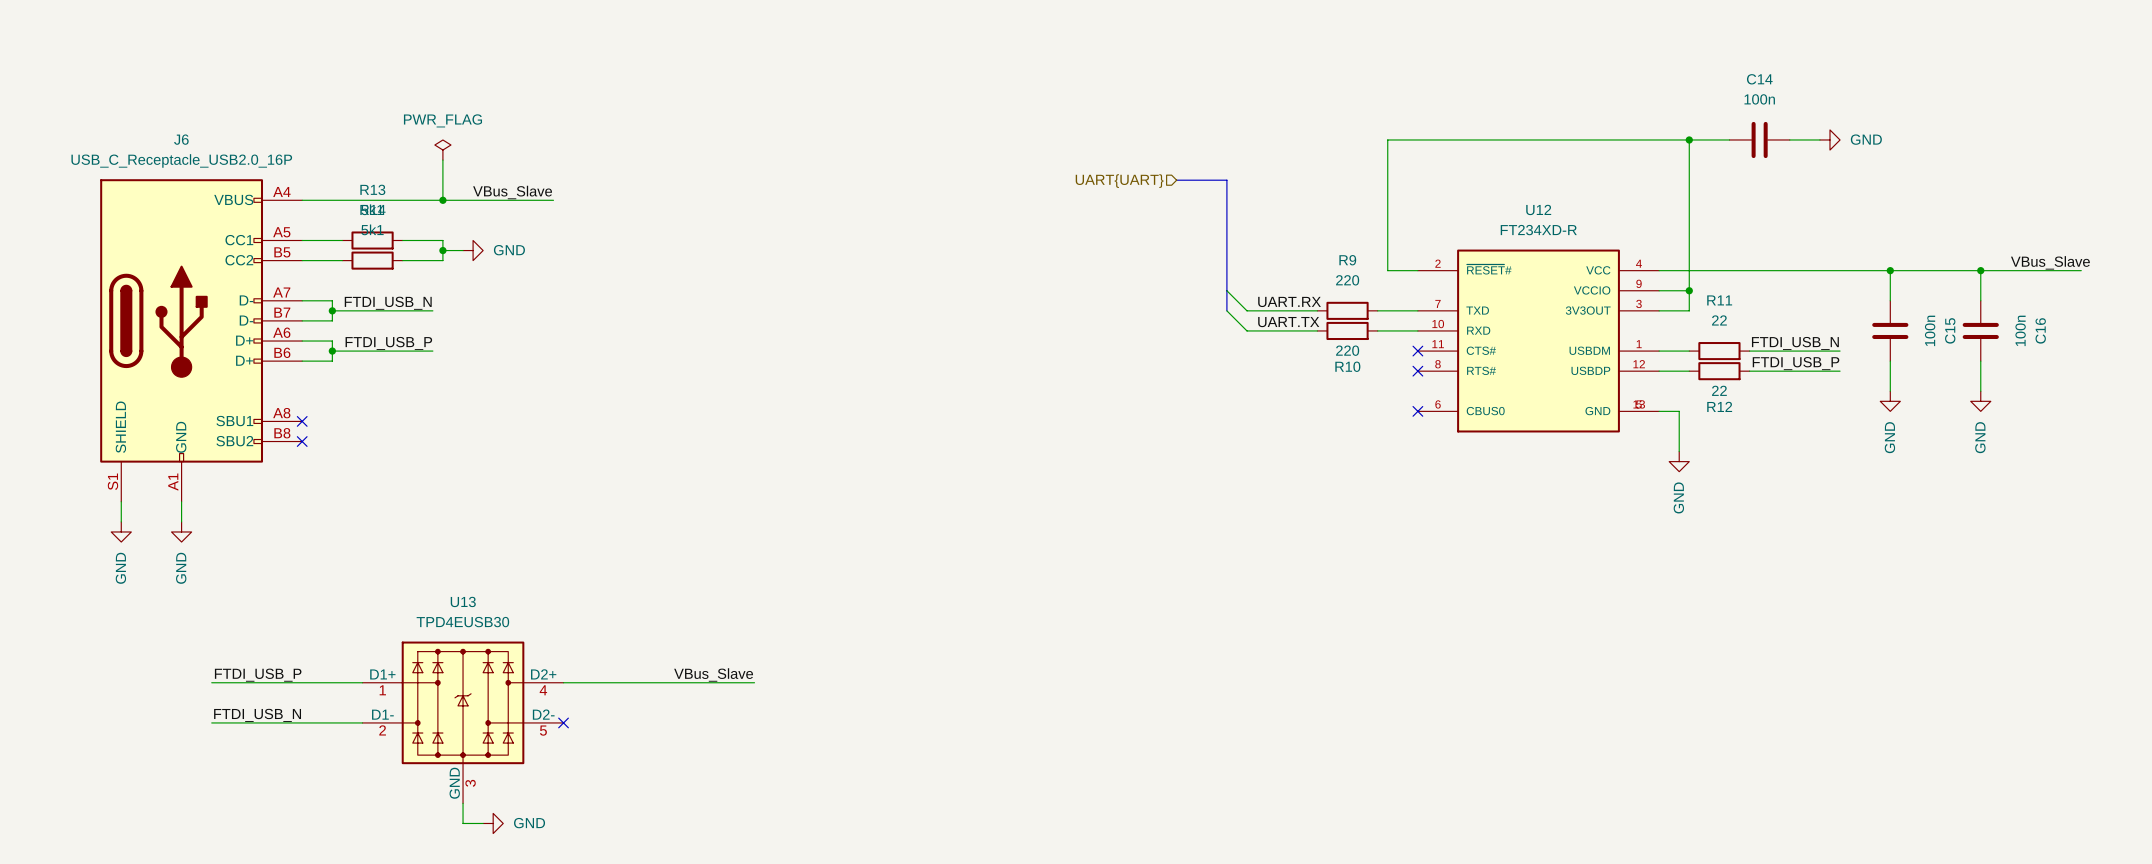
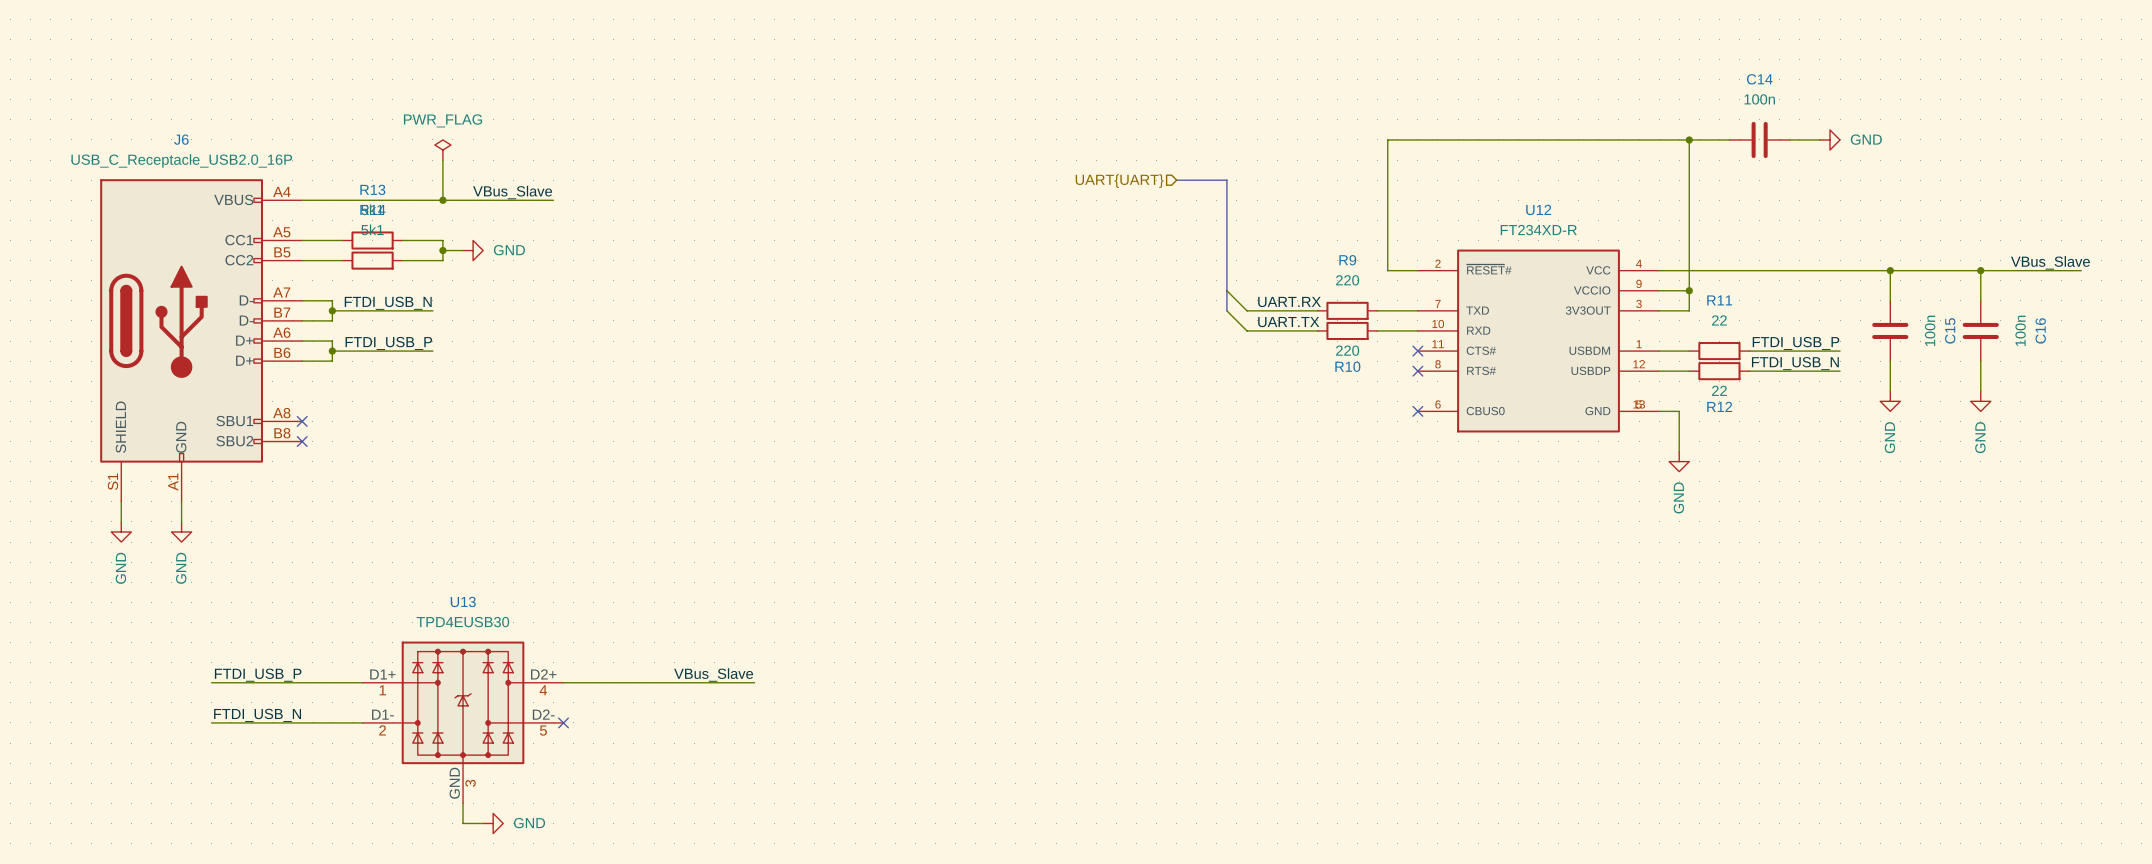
label: FTDI_USB_N (1795, 343) -> FTDI_USB_P (1796, 343)
label: FTDI_USB_P (1796, 363) -> FTDI_USB_N (1795, 363)

